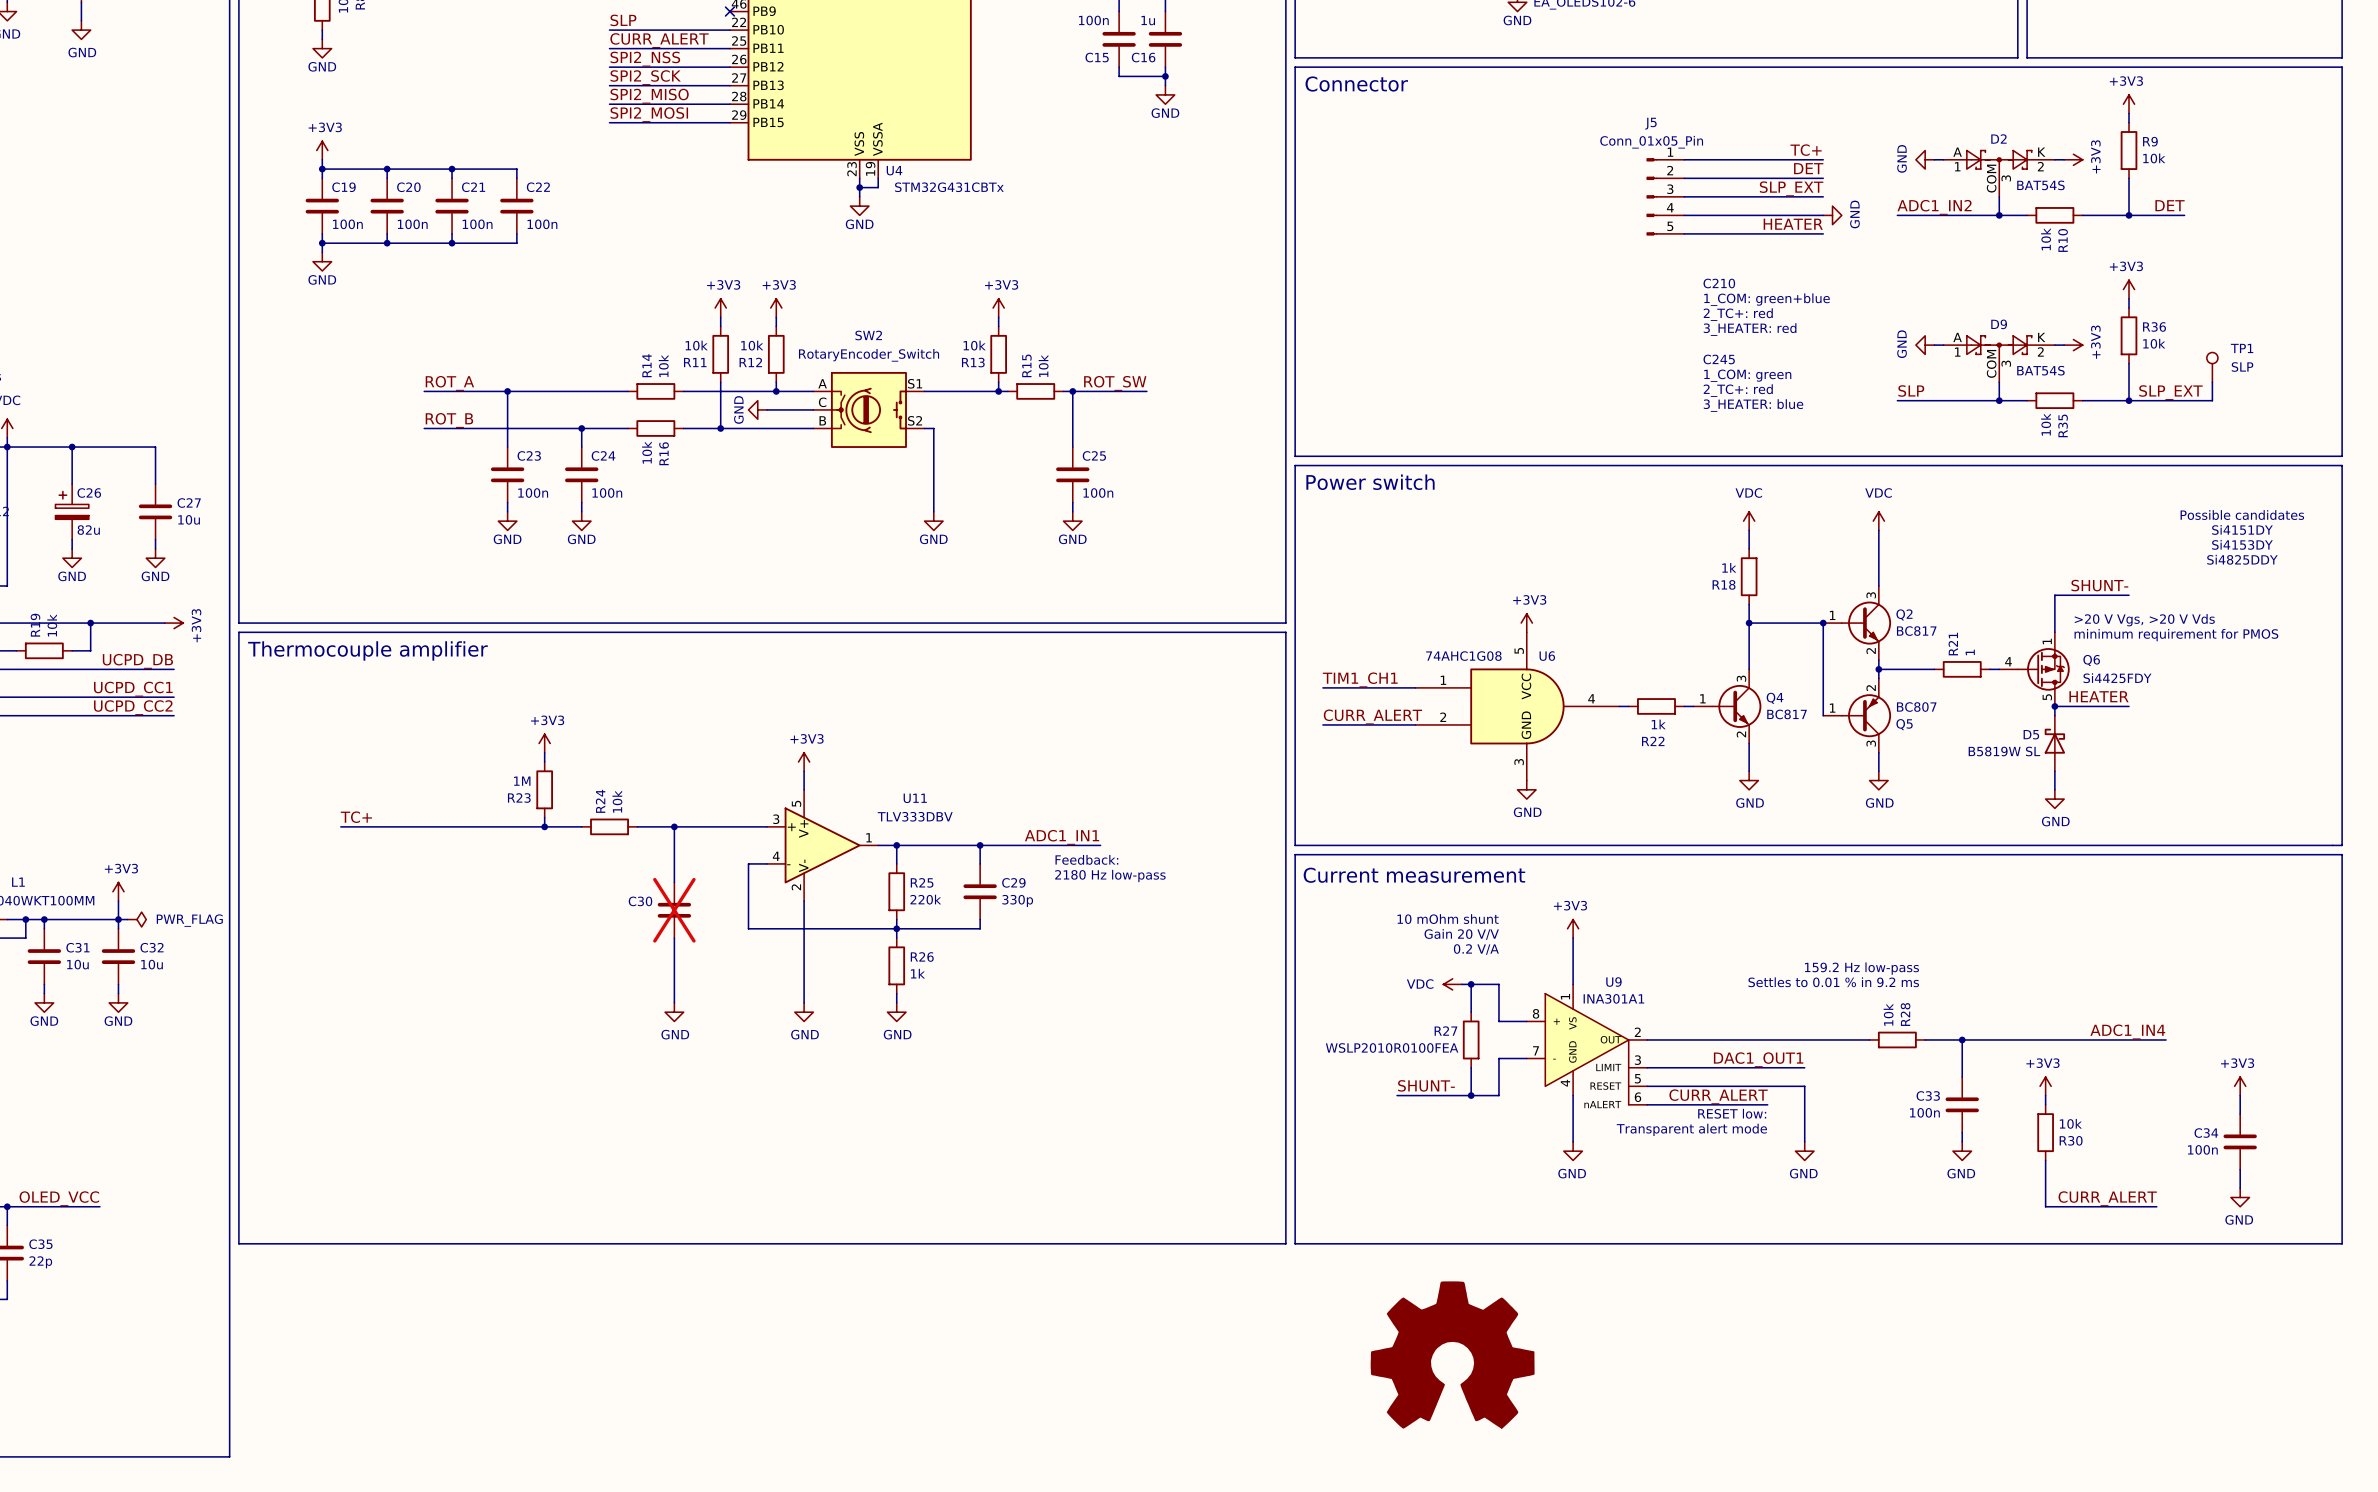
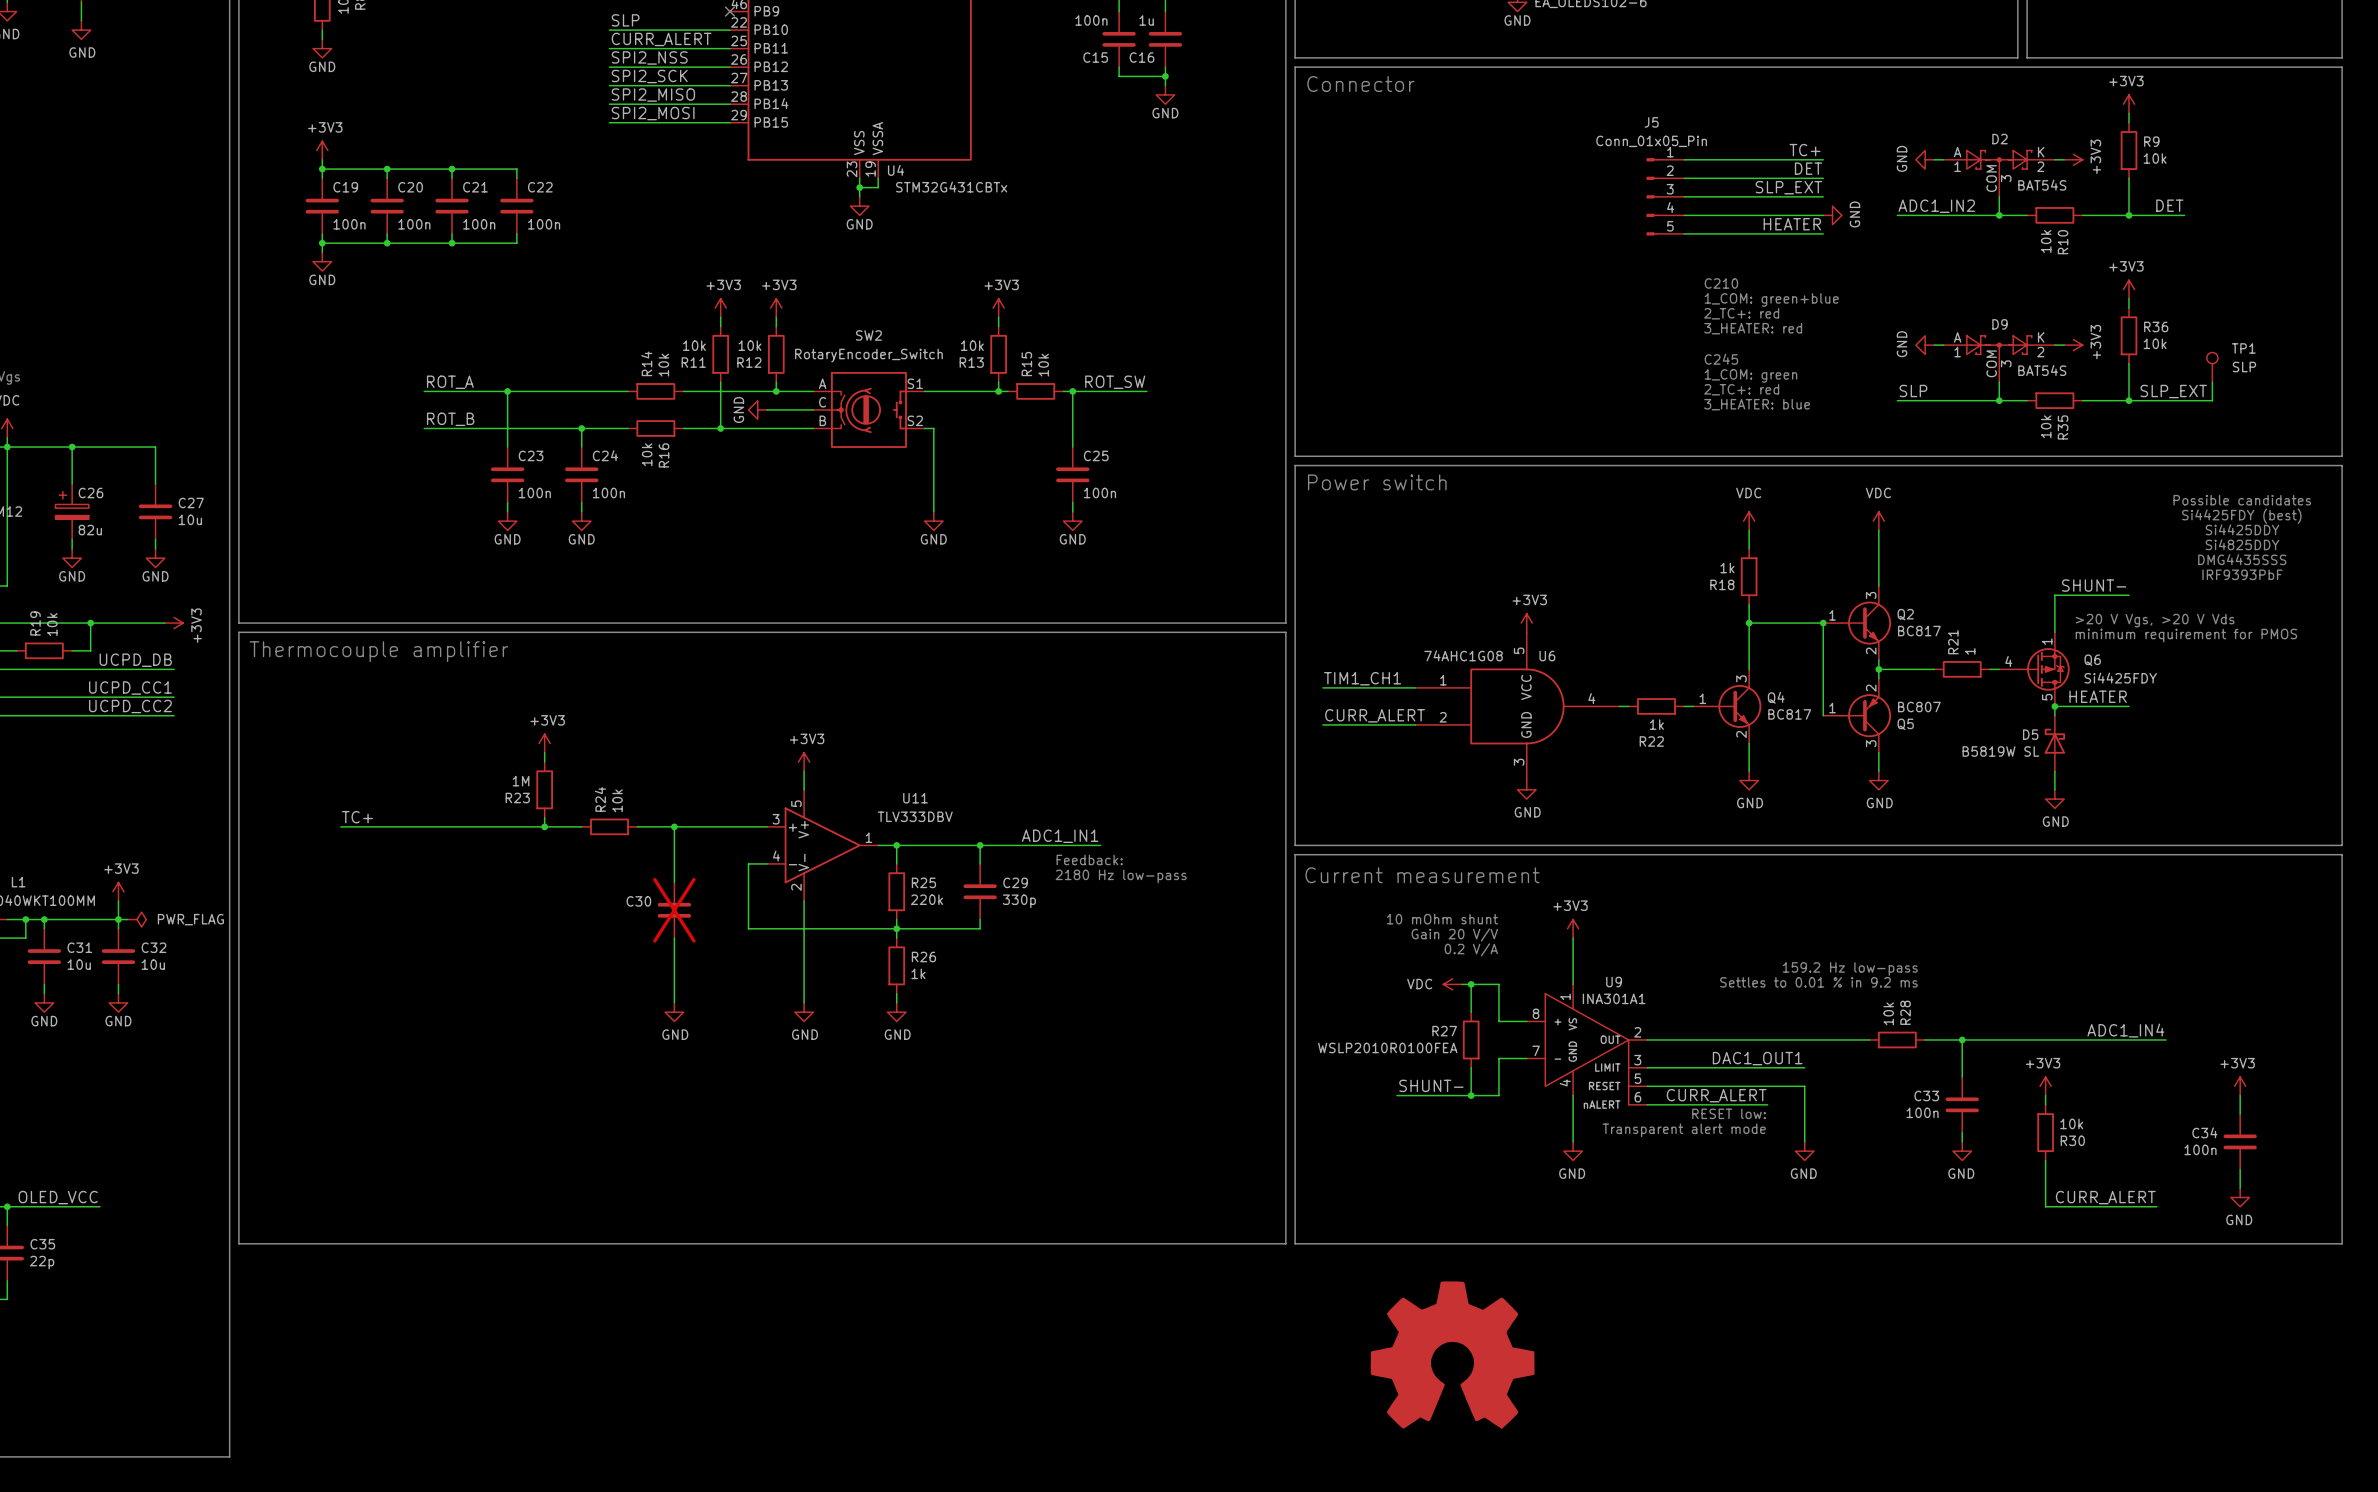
text: none -> Possible candidates (2242, 500)
text: Possible candidates (2242, 515) -> Si4425FDY (best) (2241, 516)
text: Si4151DY (2242, 529) -> Si4425DDY (2242, 529)
text: Si4153DY (2242, 544) -> Si4825DDY (2242, 544)
text: Si4825DDY (2242, 559) -> DMG4435SSS (2242, 559)
text: none -> IRF9393PbF (2242, 574)

